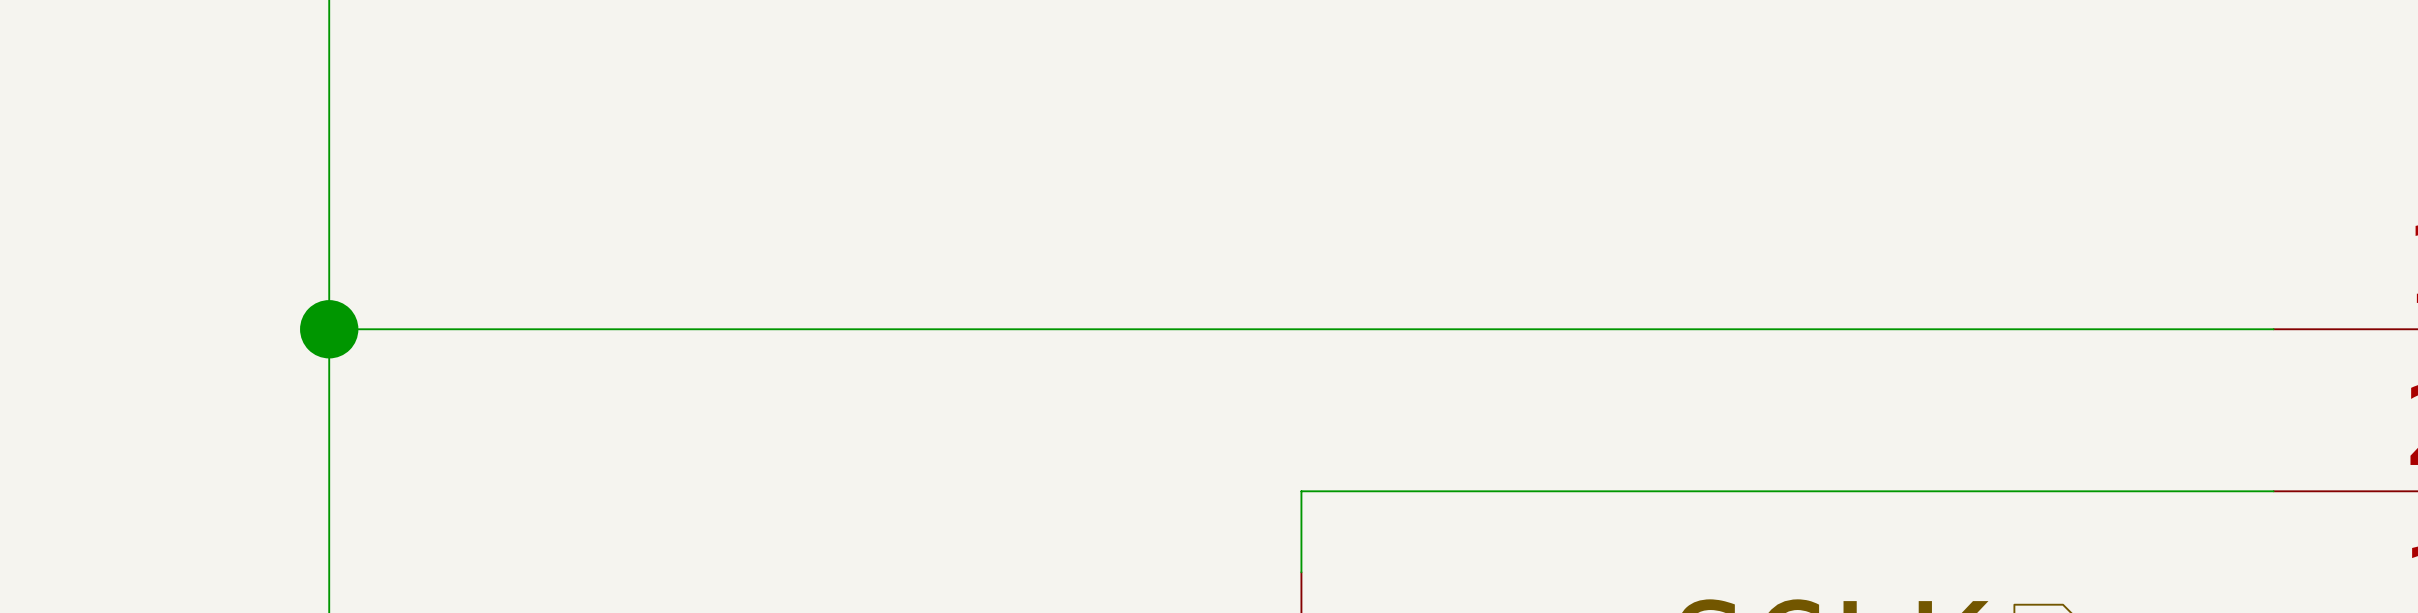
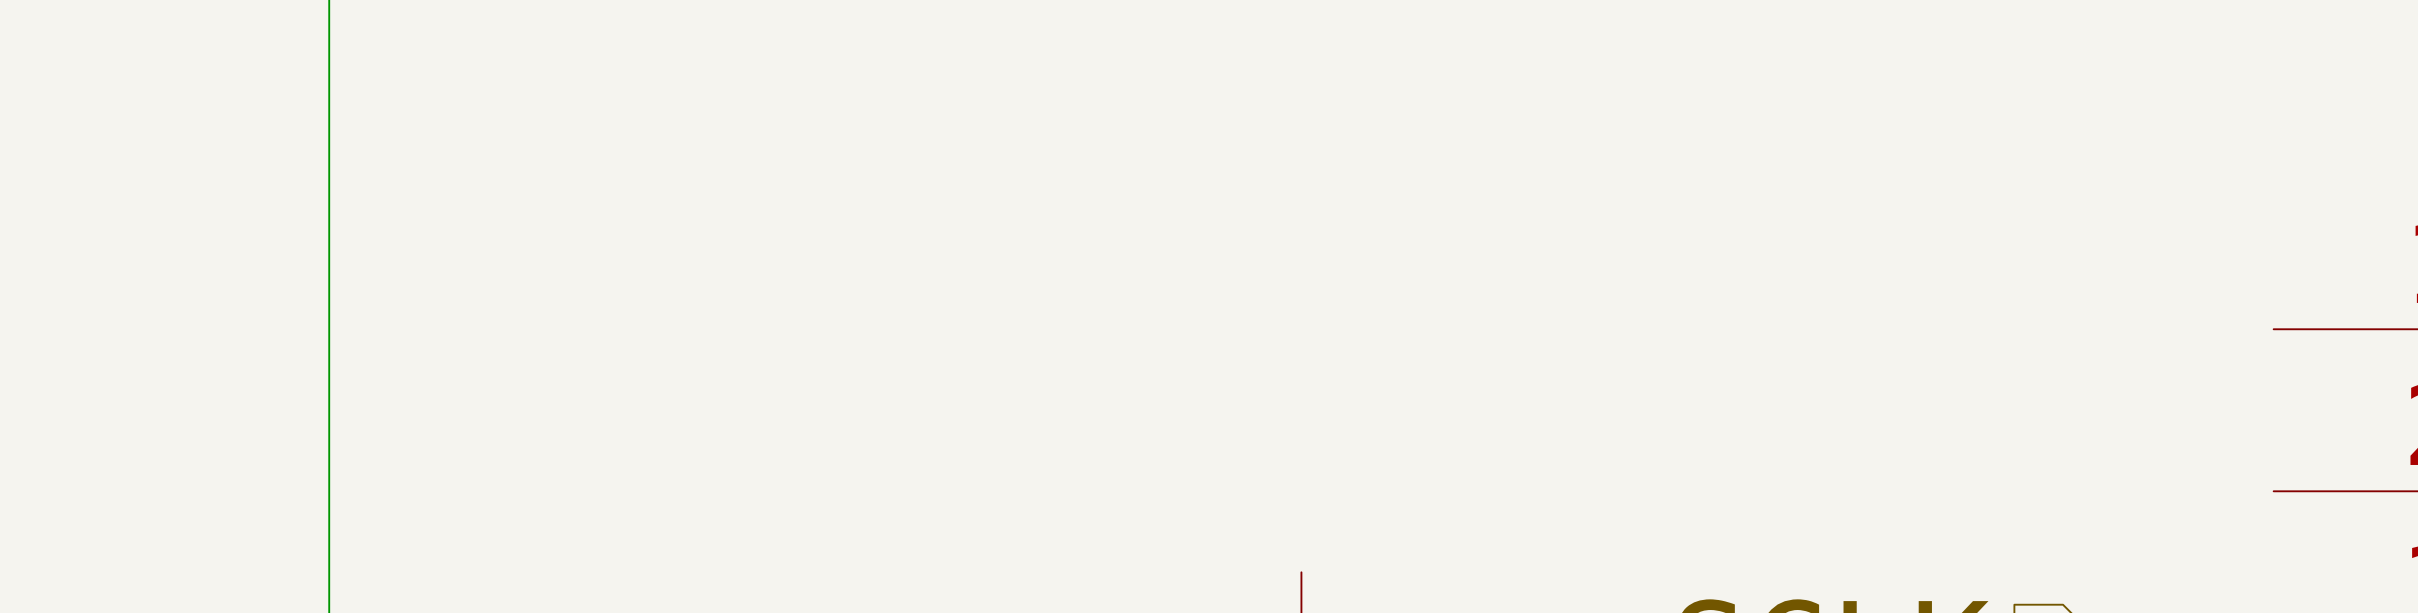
wire: (329, 329) (2273, 329) -> none
junction: (329, 329) -> none
wire: (2273, 491) (1301, 491) (1301, 572) -> none

